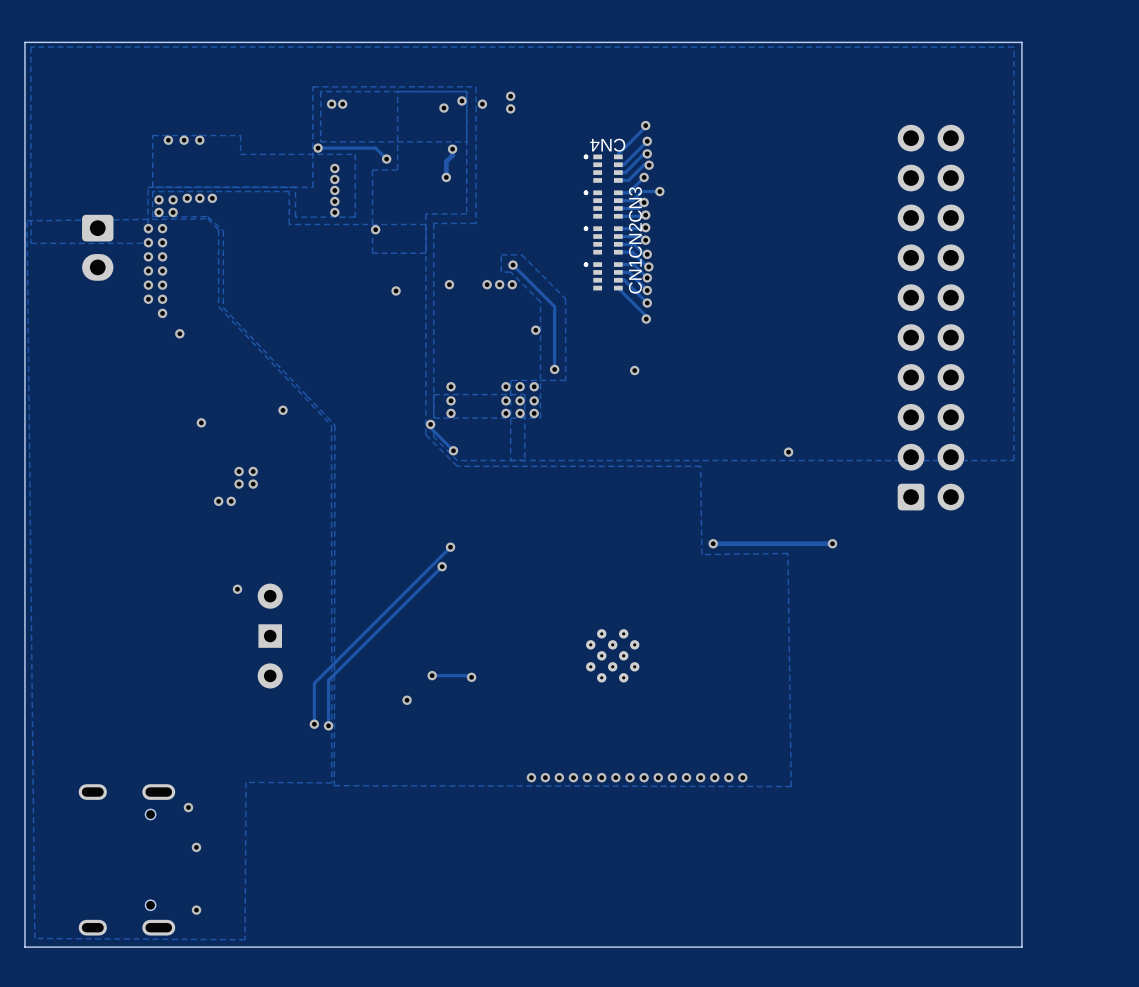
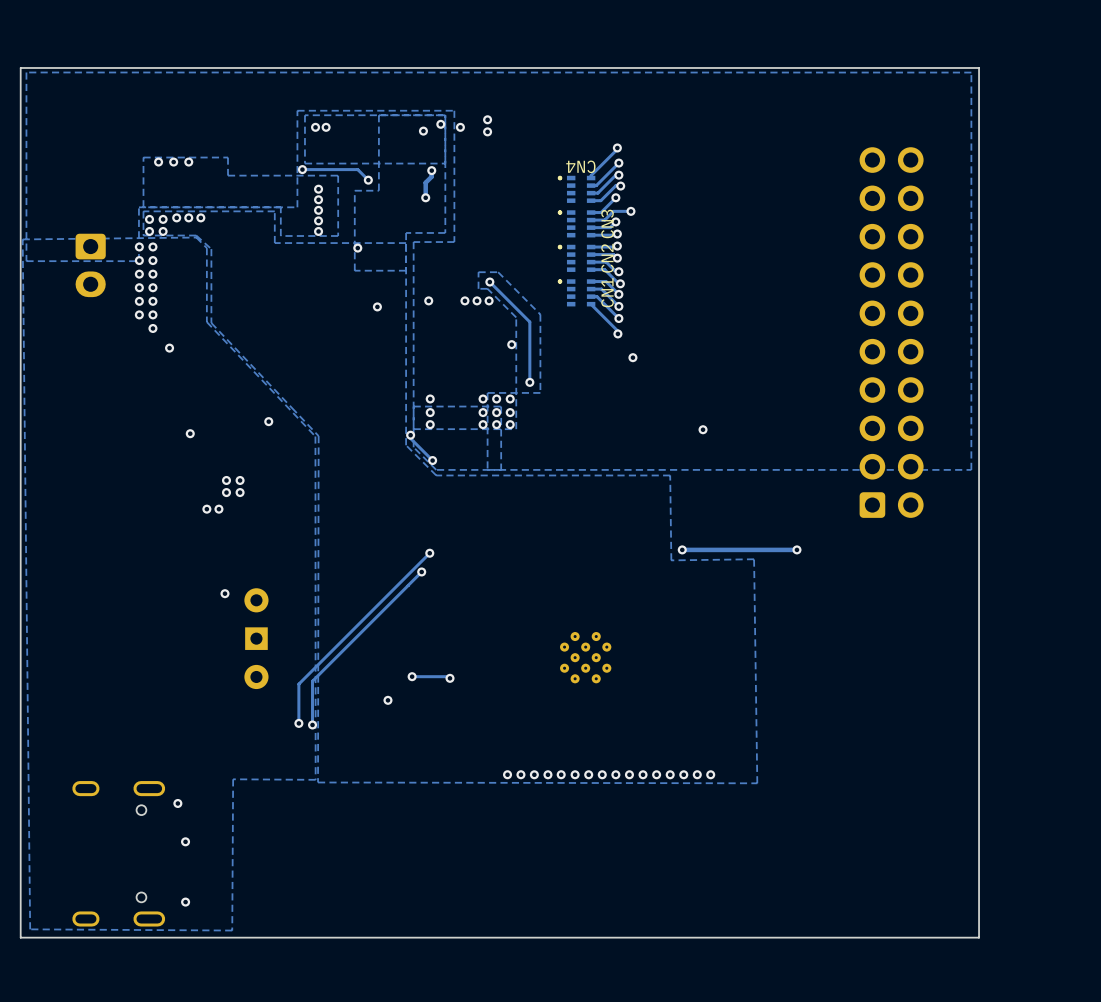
via position: (634, 370) -> (632, 357)
via: none -> (703, 429)
via: (788, 452) -> none

